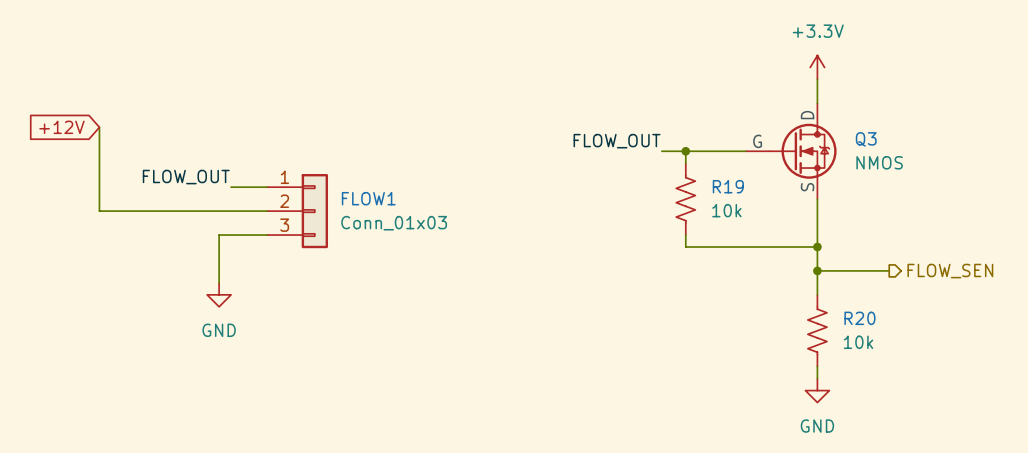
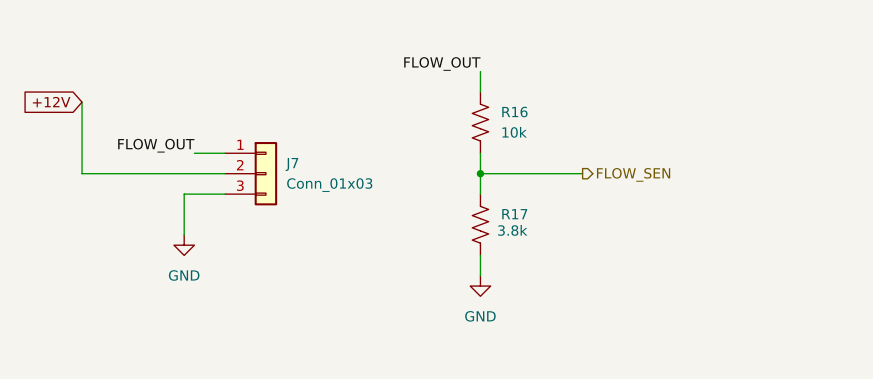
power symbol: +3.3V (817, 67) -> none
wire: (817, 79) (817, 103) -> none
wire: none -> (480, 71) (480, 91)
label position: FLOW_OUT (617, 141) -> FLOW_OUT (442, 63)
R16: none -> 10k (480, 122)
wire: (661, 151) (745, 151) -> none
wire: (685, 151) (685, 163) -> none
junction: (685, 151) -> none
Q3: NMOS (791, 151) -> none
wire: none -> (480, 153) (480, 194)
FLOW1 name: FLOW1 (368, 198) -> J7 (291, 164)
R19: 10k (685, 199) -> none
wire: (817, 199) (817, 294) -> none
wire: none -> (480, 173) (582, 173)
junction: none -> (480, 173)
wire: (685, 235) (685, 246) (817, 246) -> none
junction: (817, 246) -> none
R17: none -> 3.8k (480, 224)
wire: (817, 270) (889, 270) -> none
junction: (817, 270) -> none
hierarchical label position: FLOW_SEN (950, 271) -> FLOW_SEN (633, 174)
wire: none -> (480, 255) (480, 275)
R20: 10k (817, 330) -> none
power symbol: none -> GND (480, 286)
wire: (817, 366) (817, 378) -> none
power symbol: GND (817, 390) -> none

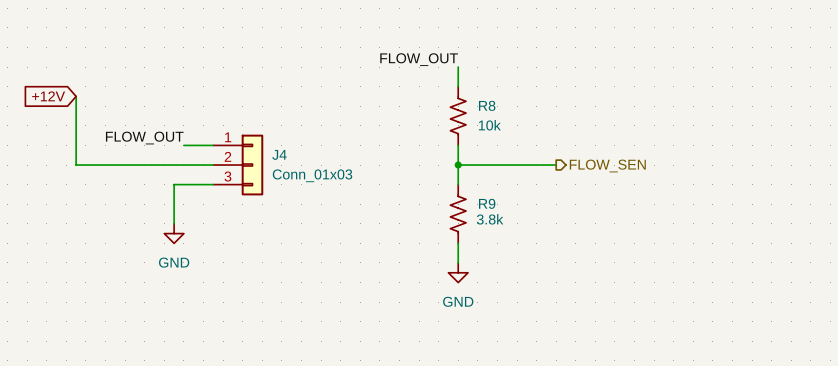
R16 name: R16 (514, 112) -> R8 (487, 105)
J7 name: J7 (291, 164) -> J4 (279, 154)
R17 name: R17 (514, 214) -> R9 (487, 203)

